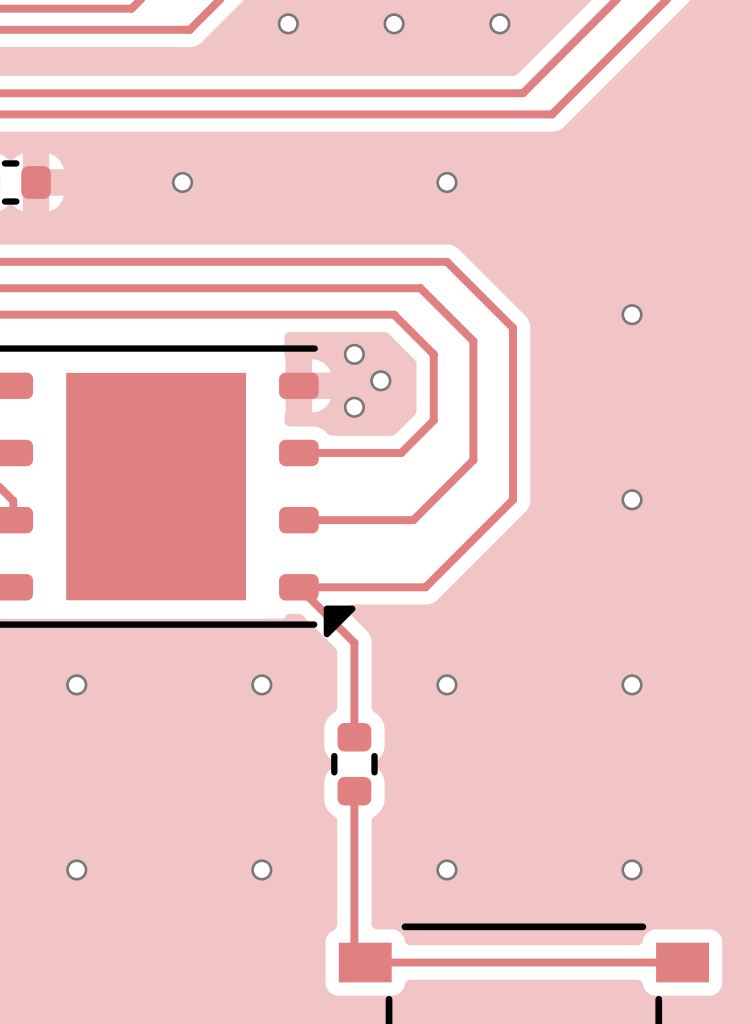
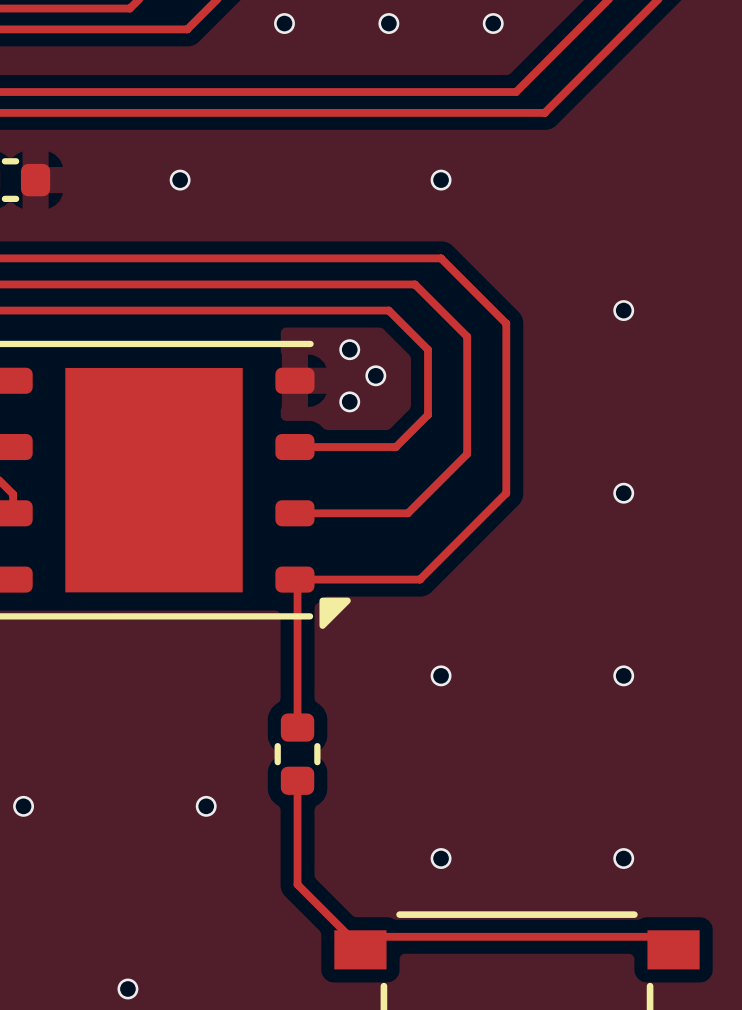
track: (301, 589) (354, 642) (354, 737) -> (297, 582) (297, 727)
via: (76, 684) -> none
via: (261, 684) -> none
part position: (354, 764) -> (297, 754)
track: (354, 791) (354, 951) (365, 962) (682, 962) -> (297, 780) (297, 884) (349, 936) (660, 936) (673, 949)
via: none -> (23, 806)
via: none -> (206, 806)
via: (76, 869) -> none
via: (261, 869) -> none
via: none -> (127, 988)

